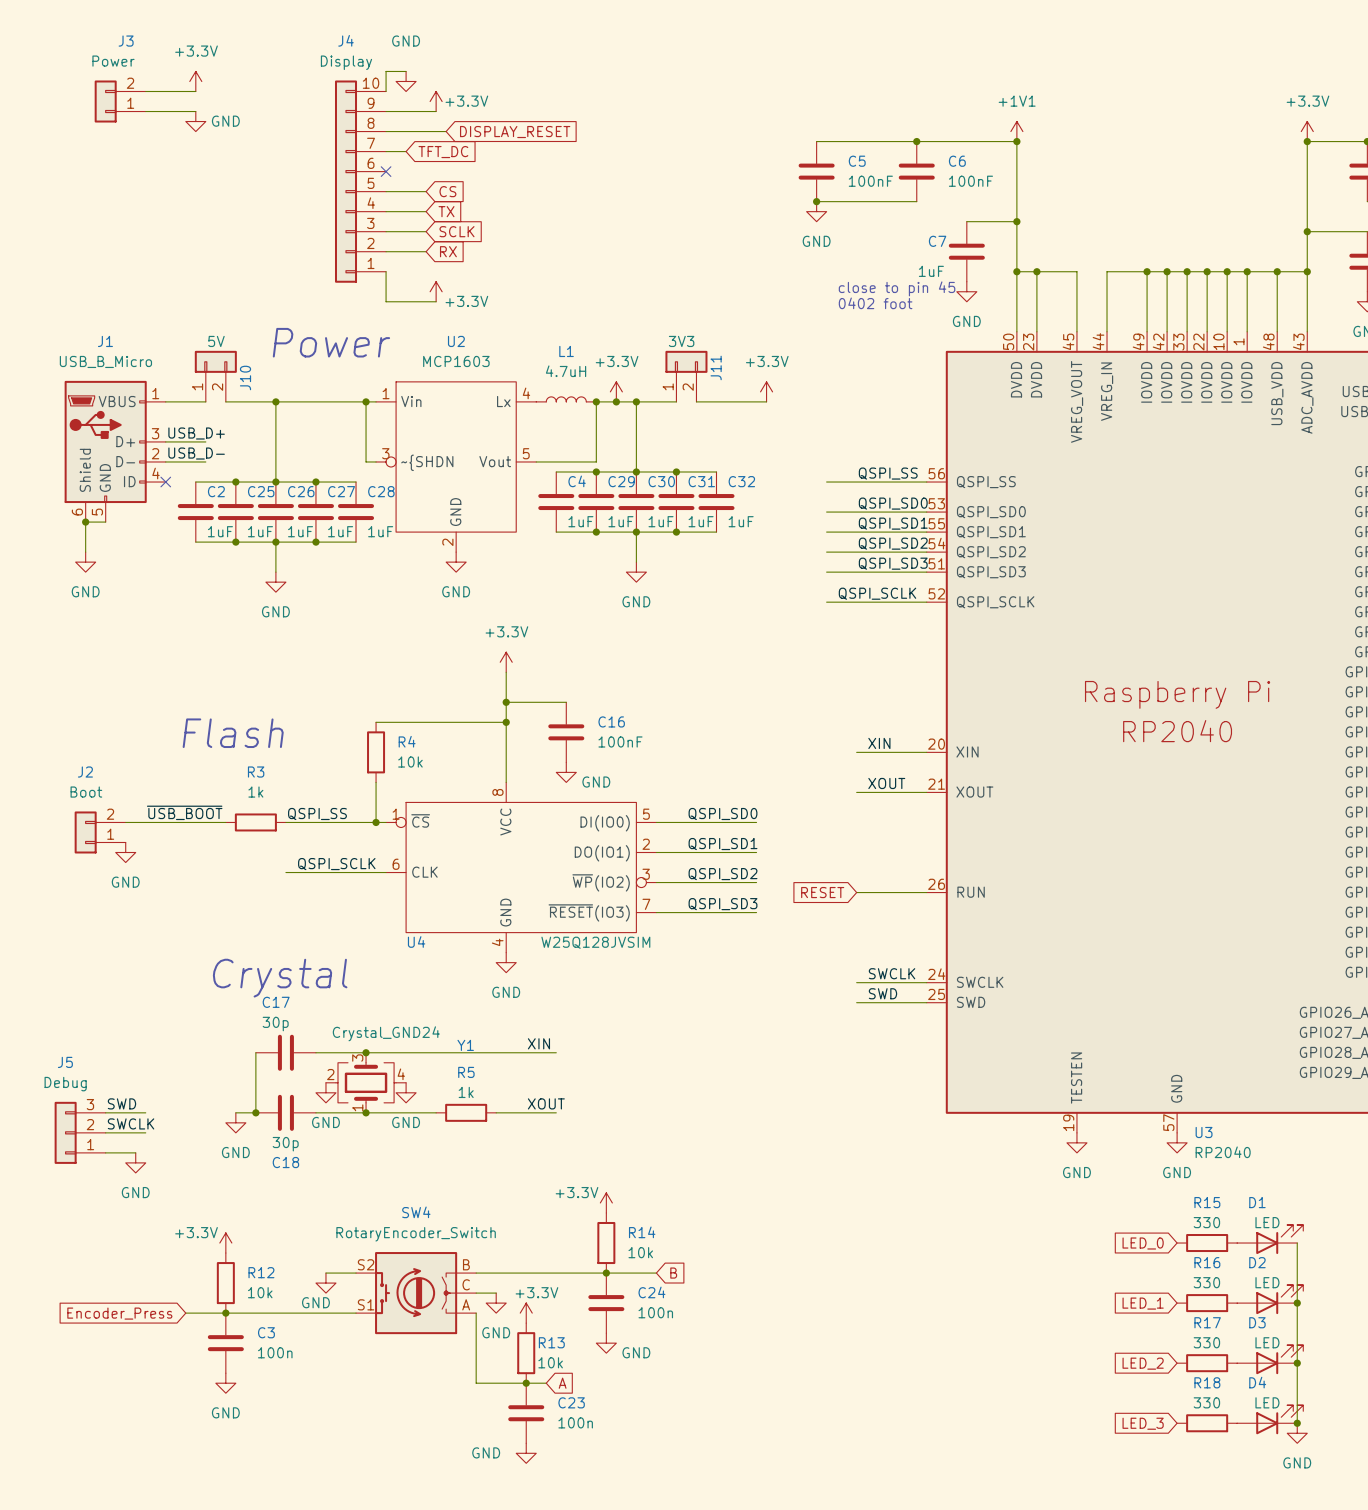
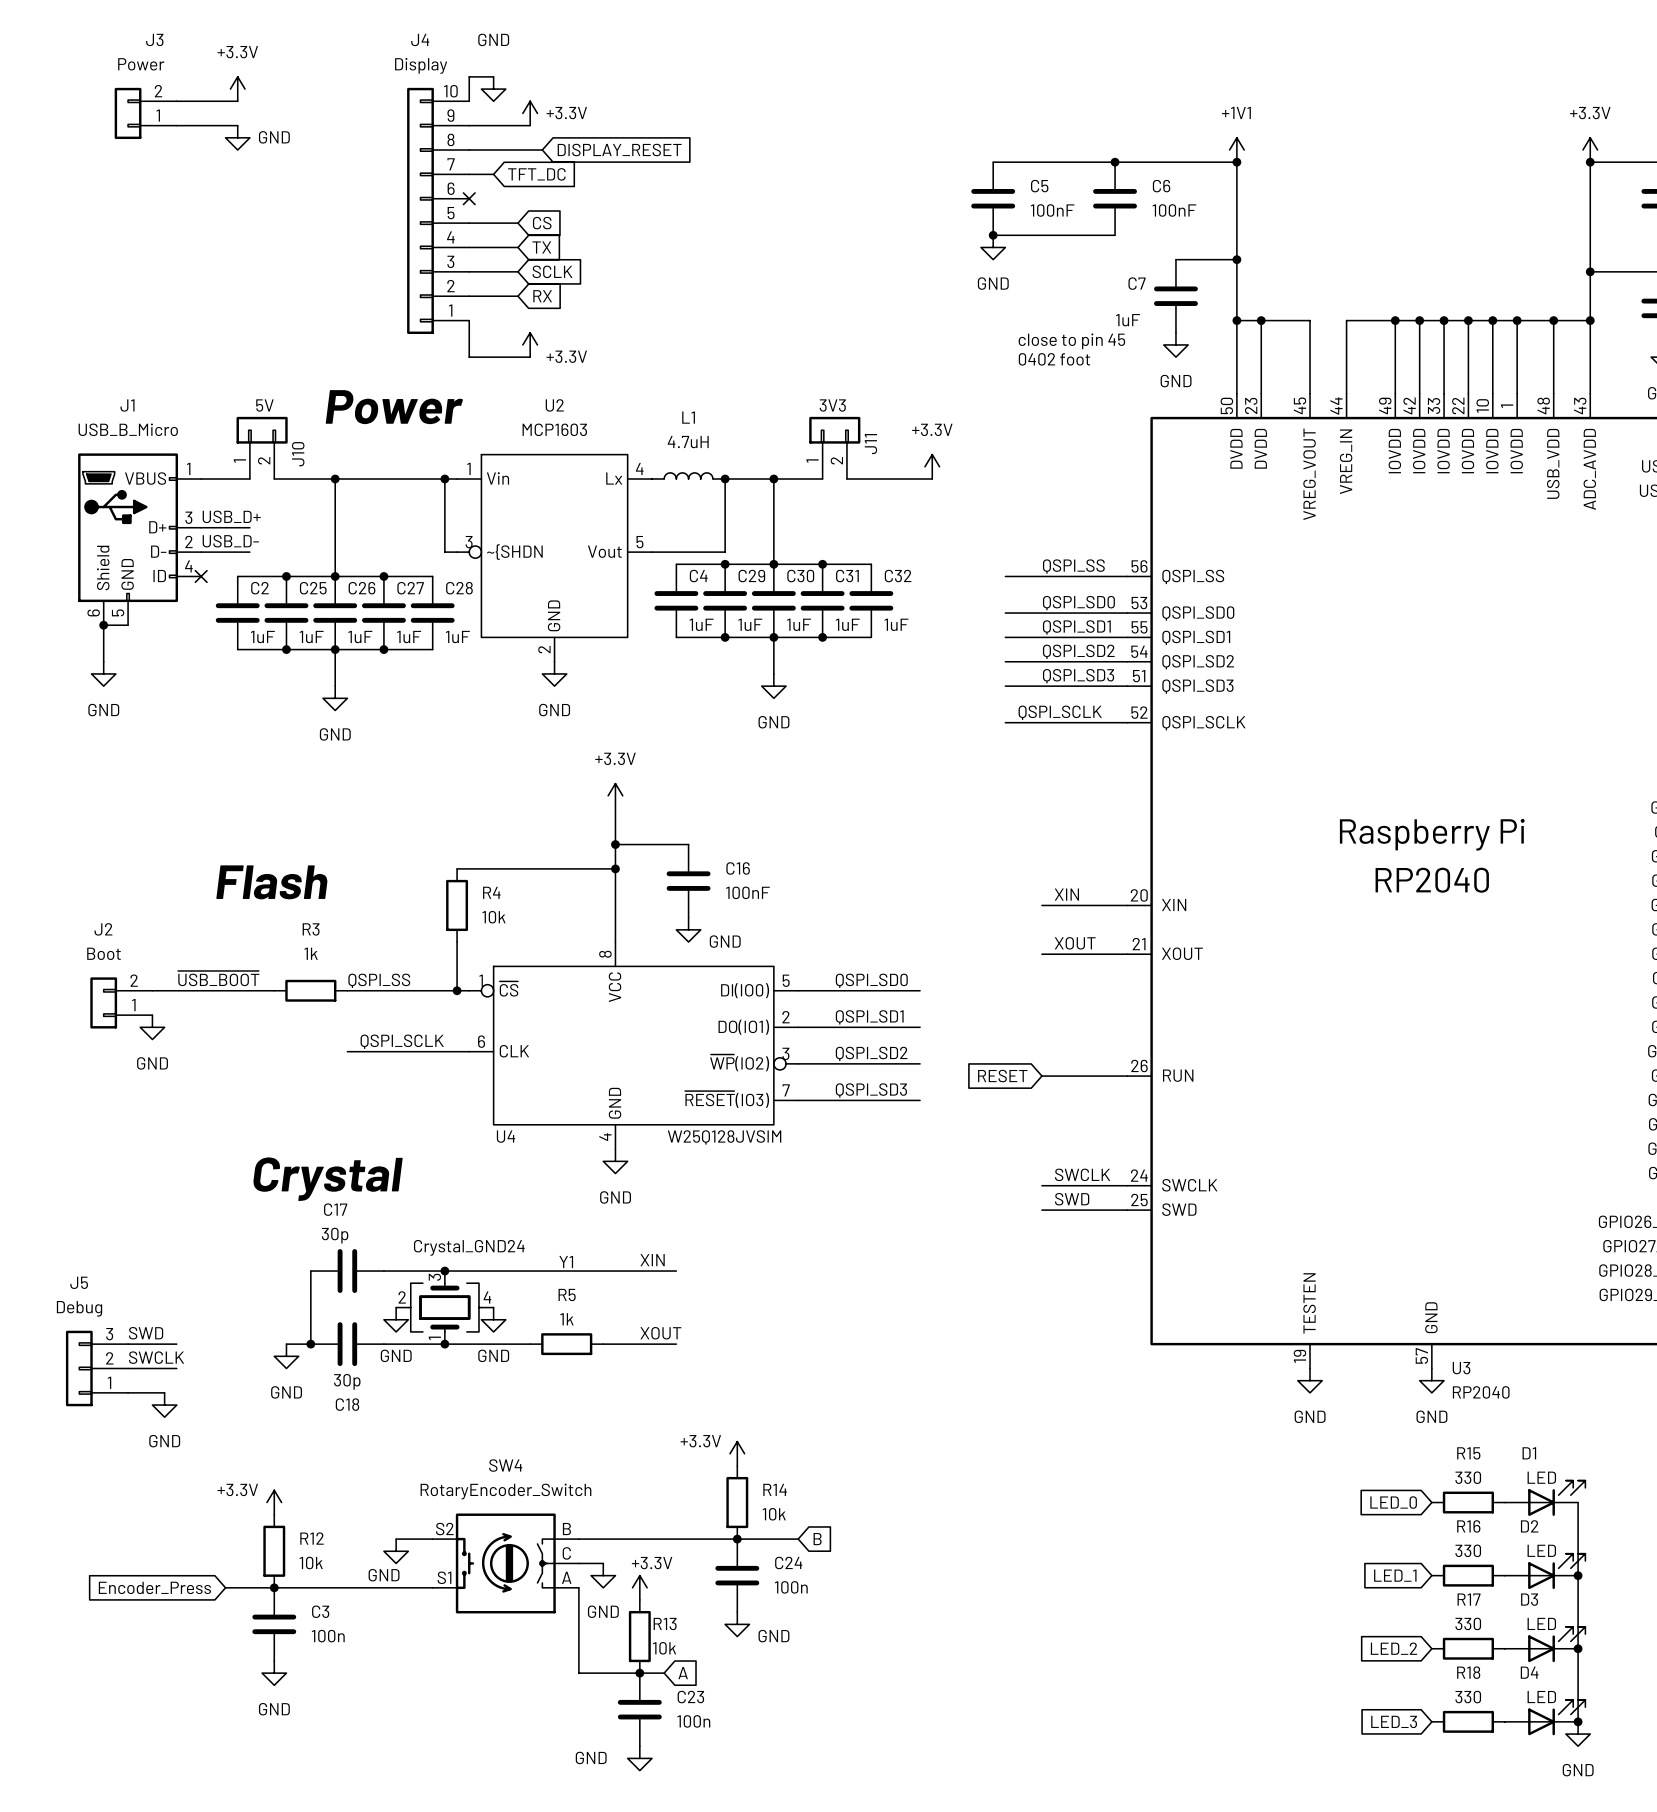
power symbol: +3.3V (616, 391) -> none
junction: (616, 401) -> none

